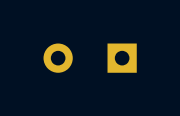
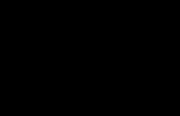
part: (90, 58) -> none

